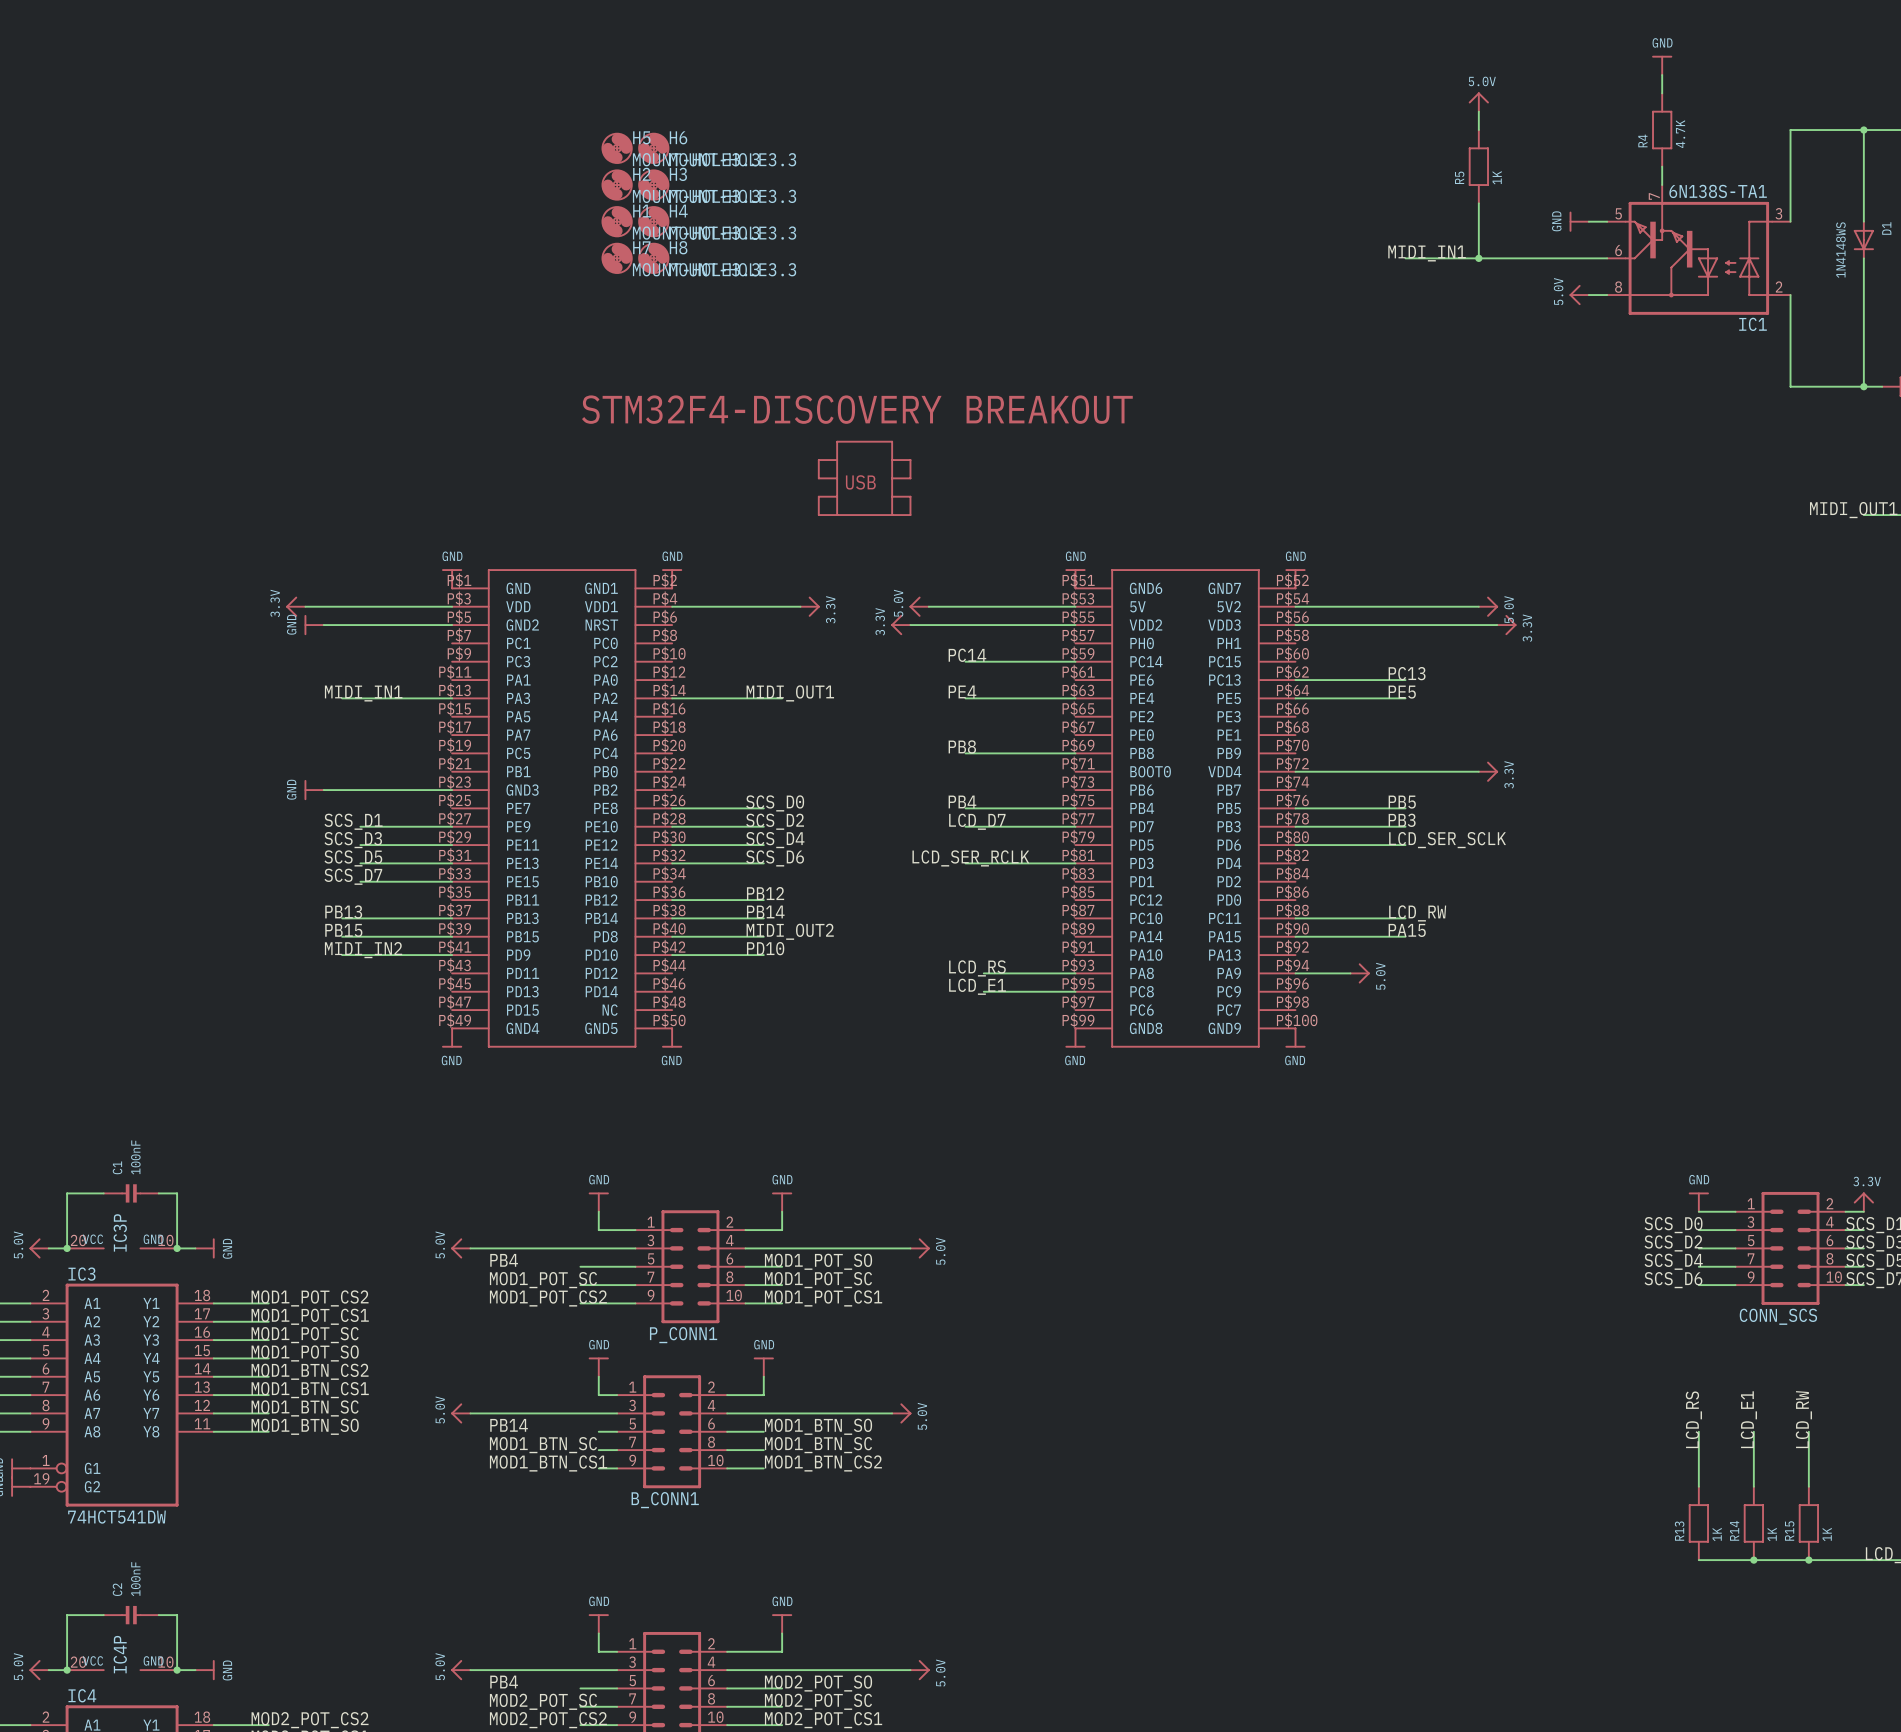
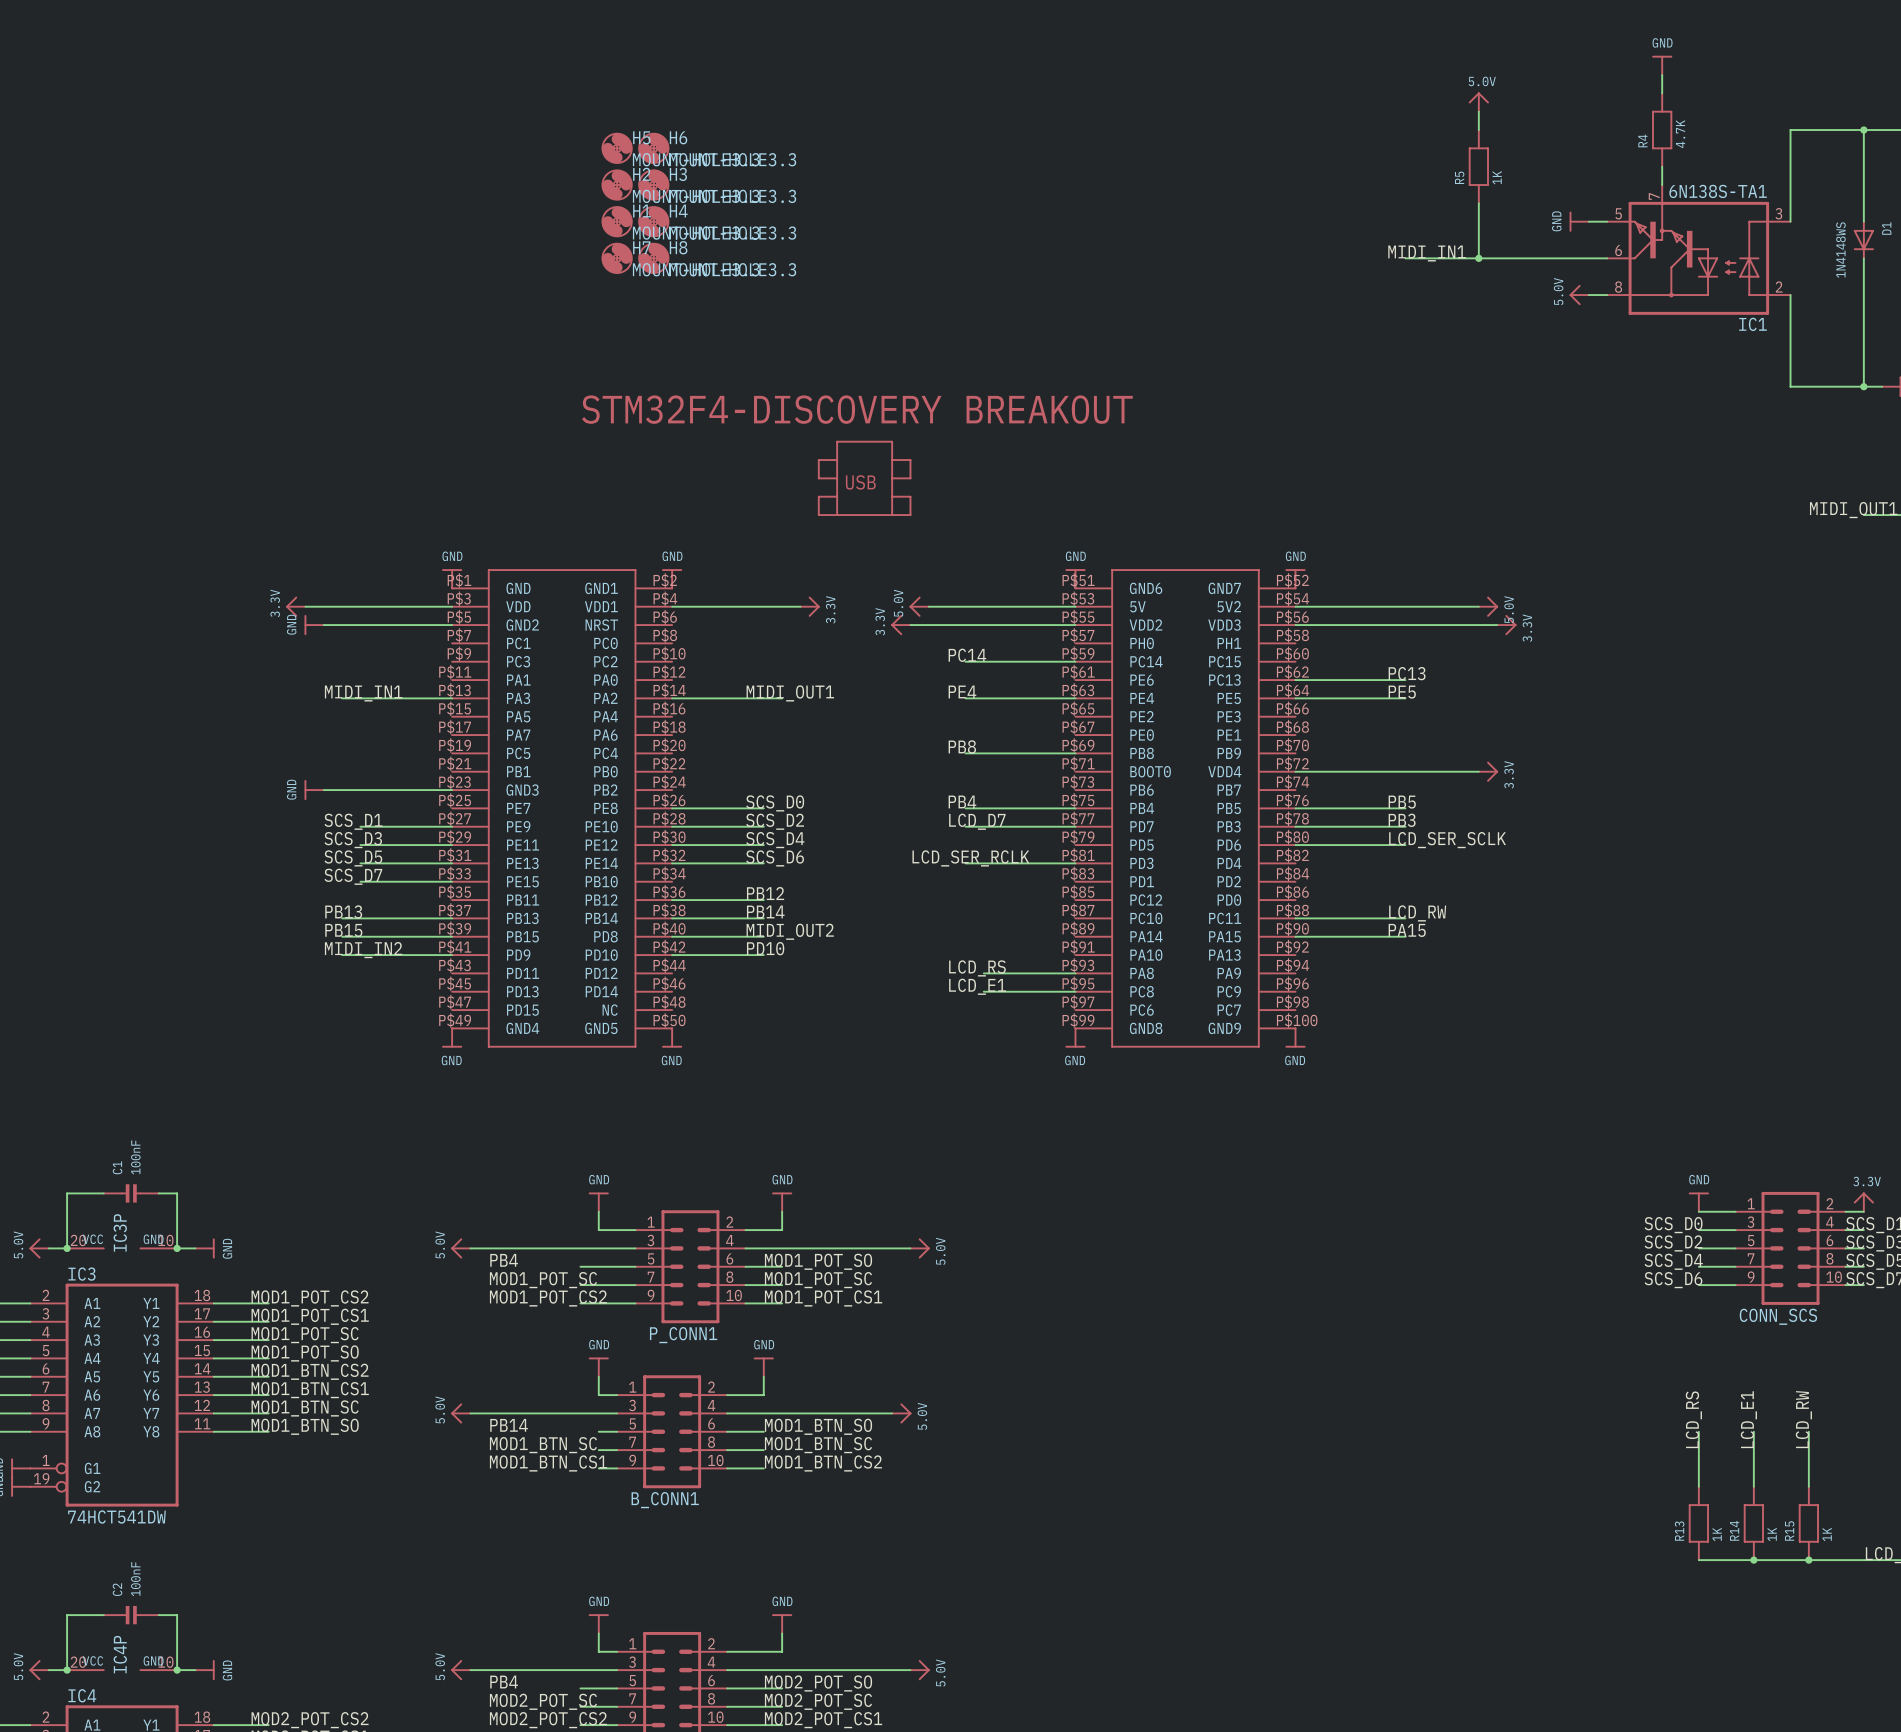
wire: (1295, 973) (1350, 973) -> none
power symbol: 5.0V (1360, 973) -> none

